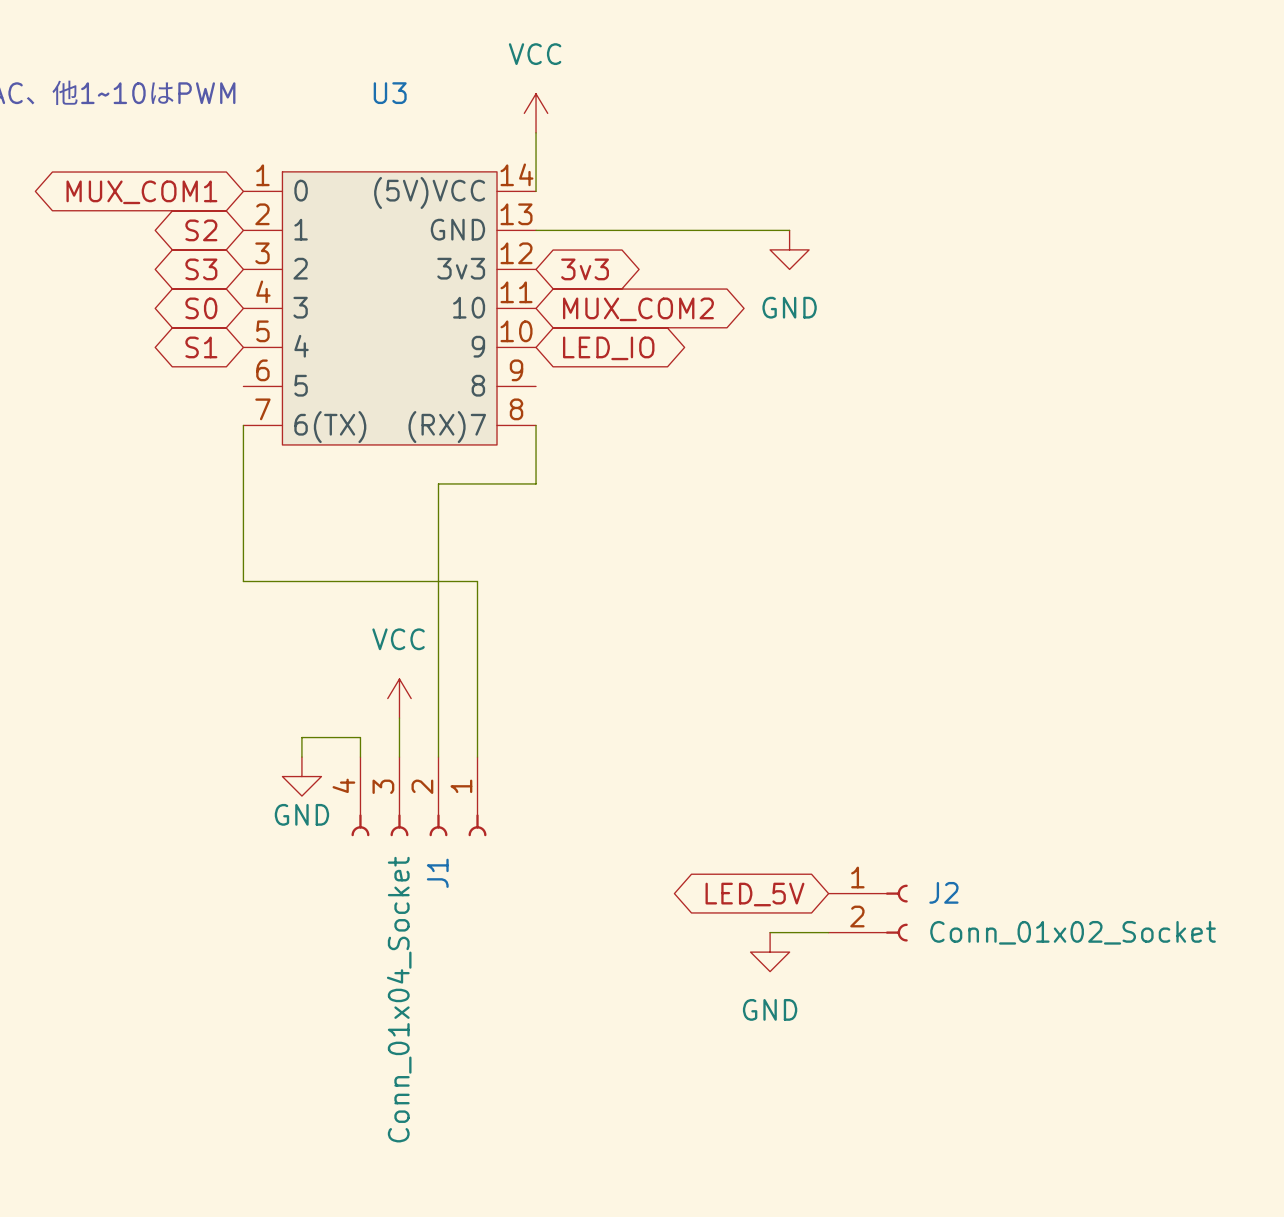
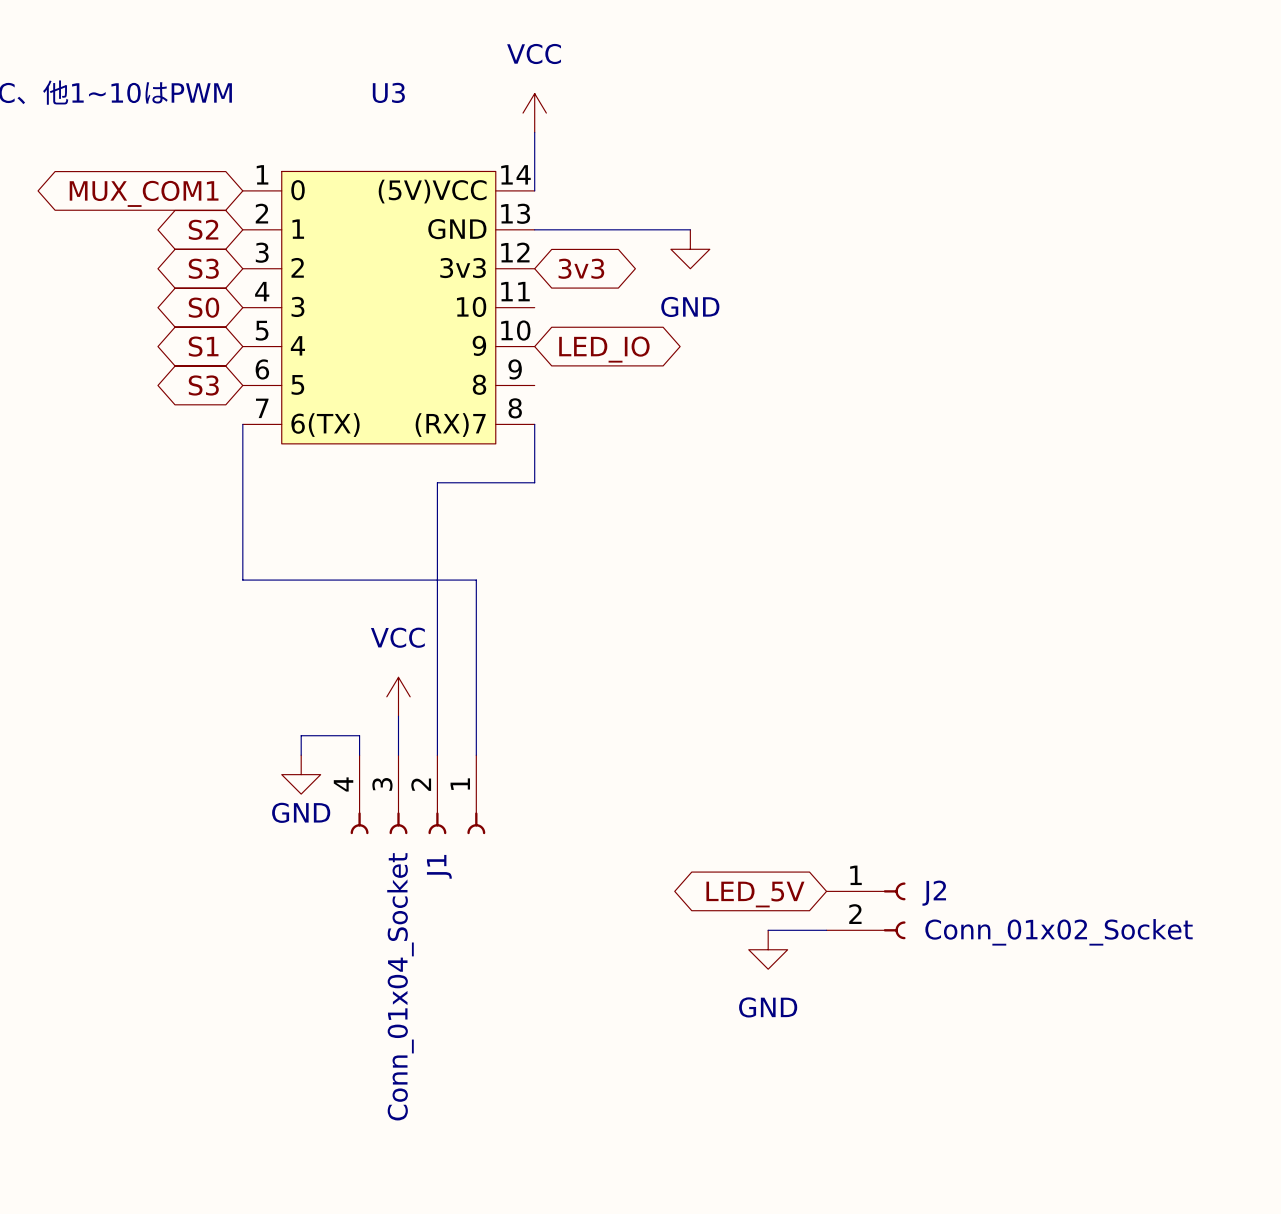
wire: (692, 230) (789, 230) -> none
power symbol position: GND (789, 249) -> GND (690, 249)
global label: MUX_COM2 (638, 309) -> none
global label: none -> S3 (203, 385)

